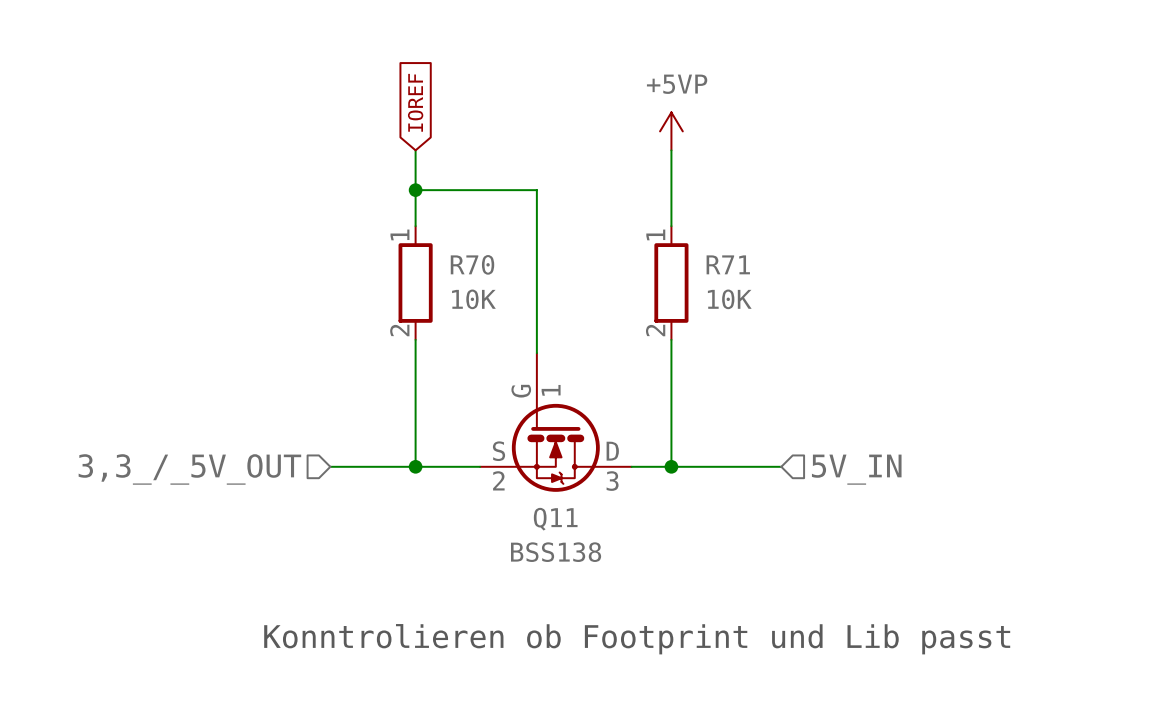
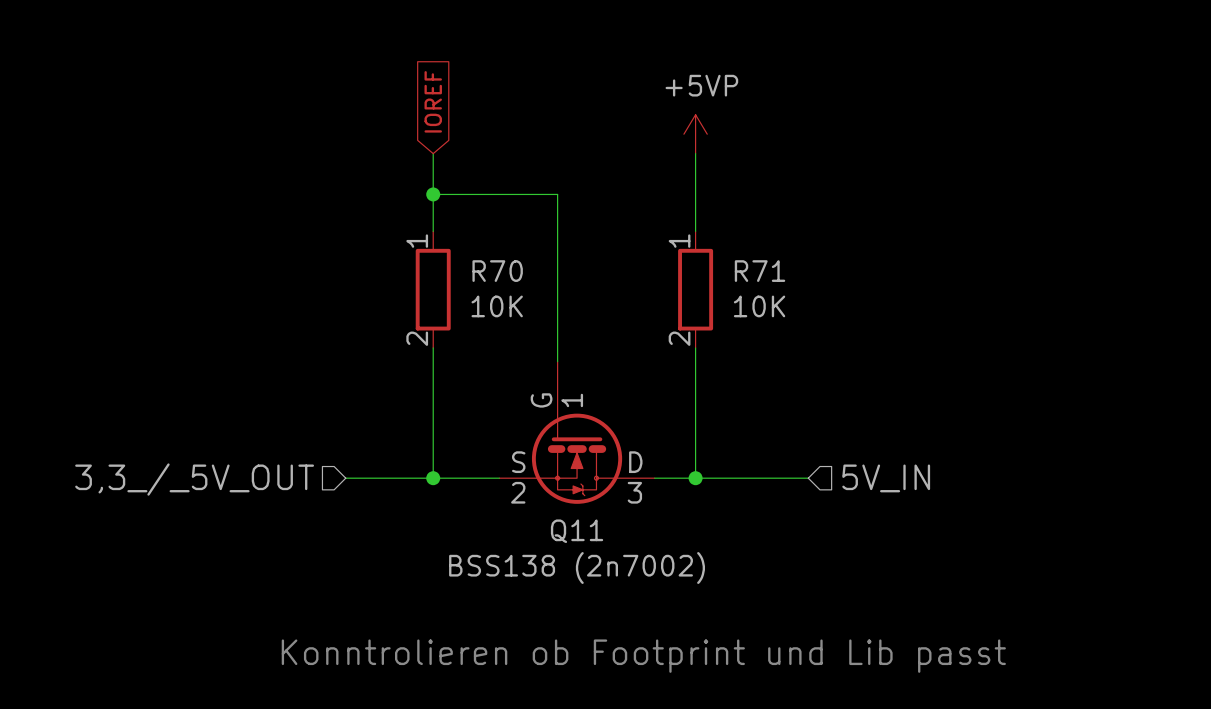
Q11 value: BSS138 (556, 552) -> BSS138 (2n7002) (577, 568)

